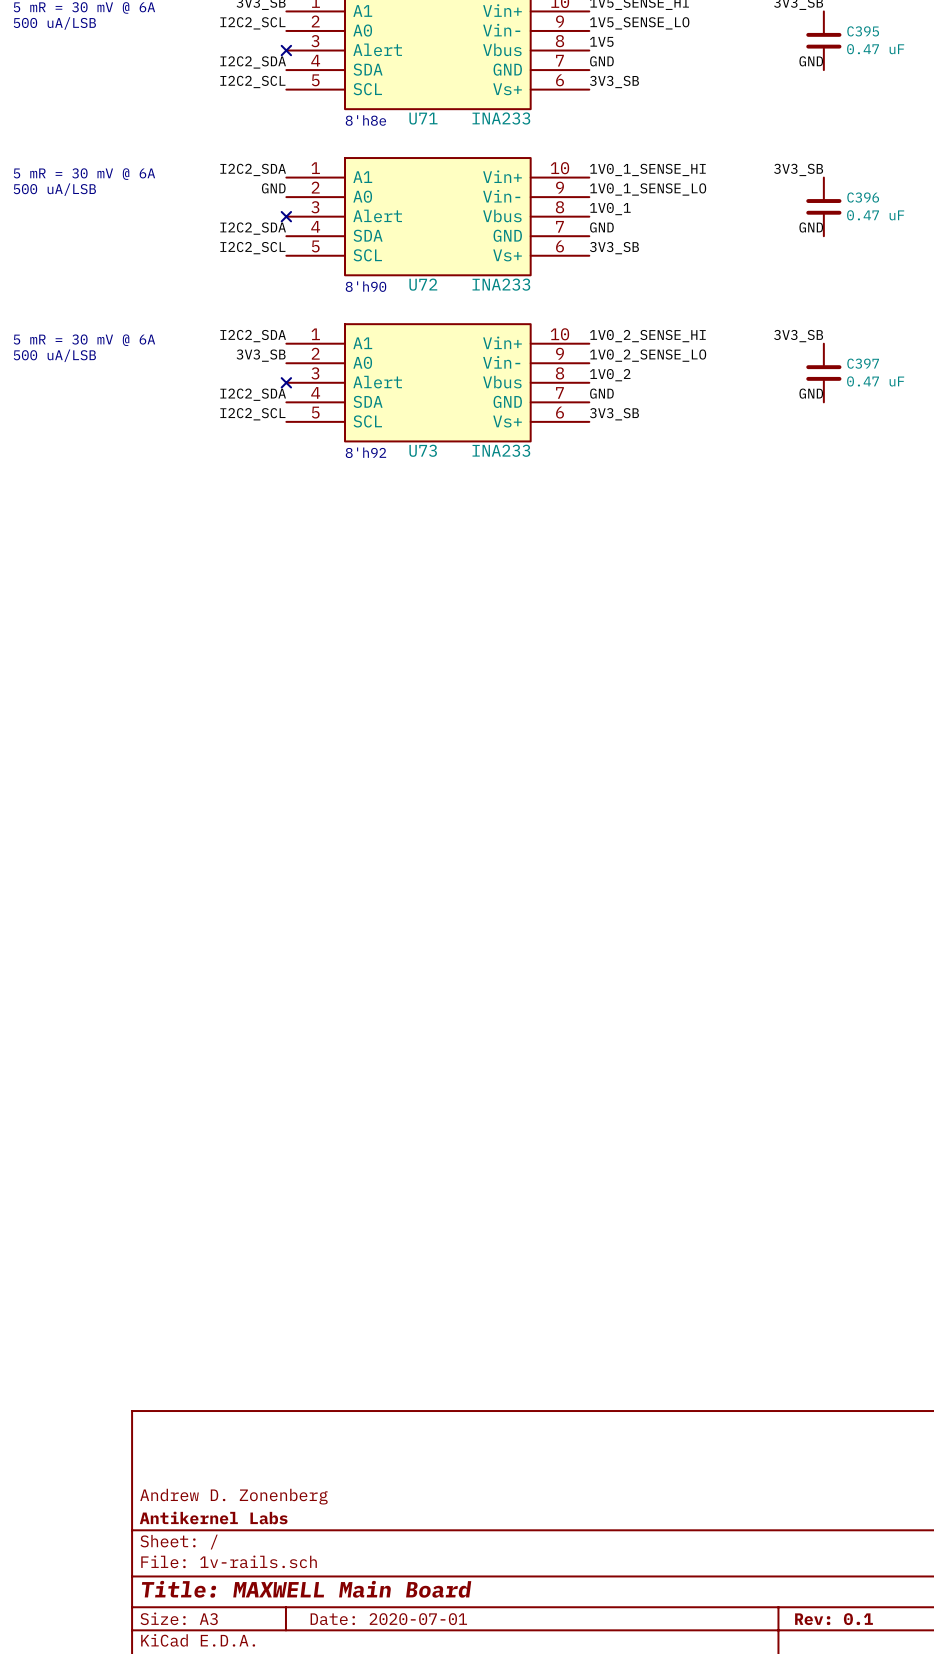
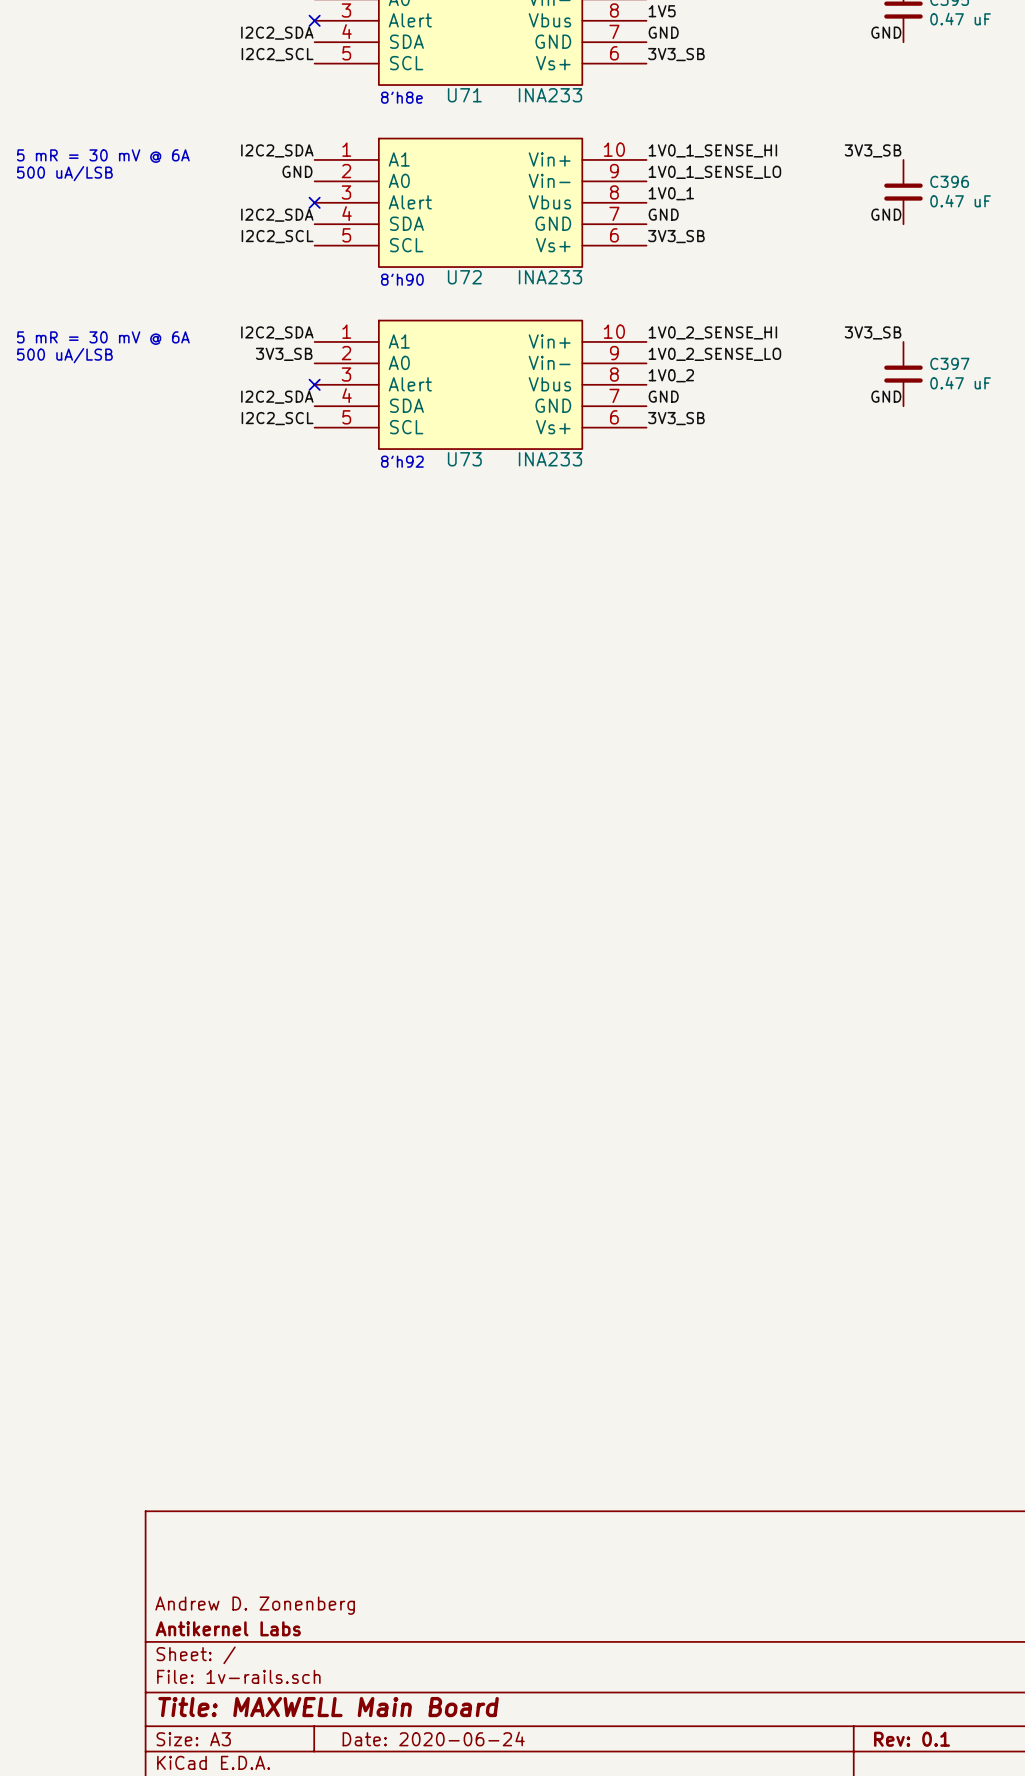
title block: Date: 2020-07-01 (388, 1619) -> Date: 2020-06-24 (433, 1738)

